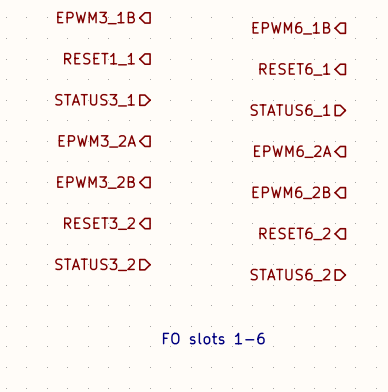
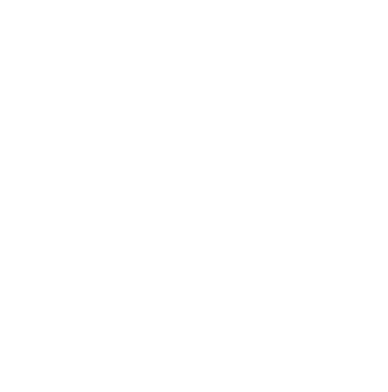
hierarchical label: EPWM3_1B (96, 18) -> none
hierarchical label: EPWM6_1B (291, 28) -> none
hierarchical label: RESET1_1 (99, 59) -> none
hierarchical label: RESET6_1 (294, 69) -> none
hierarchical label: STATUS3_1 (95, 100) -> none
hierarchical label: STATUS6_1 (290, 110) -> none
hierarchical label: EPWM3_2A (97, 141) -> none
hierarchical label: EPWM6_2A (292, 151) -> none
hierarchical label: EPWM3_2B (96, 182) -> none
hierarchical label: EPWM6_2B (291, 192) -> none
hierarchical label: RESET3_2 (99, 223) -> none
hierarchical label: RESET6_2 (294, 233) -> none
hierarchical label: STATUS3_2 (95, 264) -> none
hierarchical label: STATUS6_2 (290, 275) -> none
text: FO slots 1-6 (213, 338) -> none

